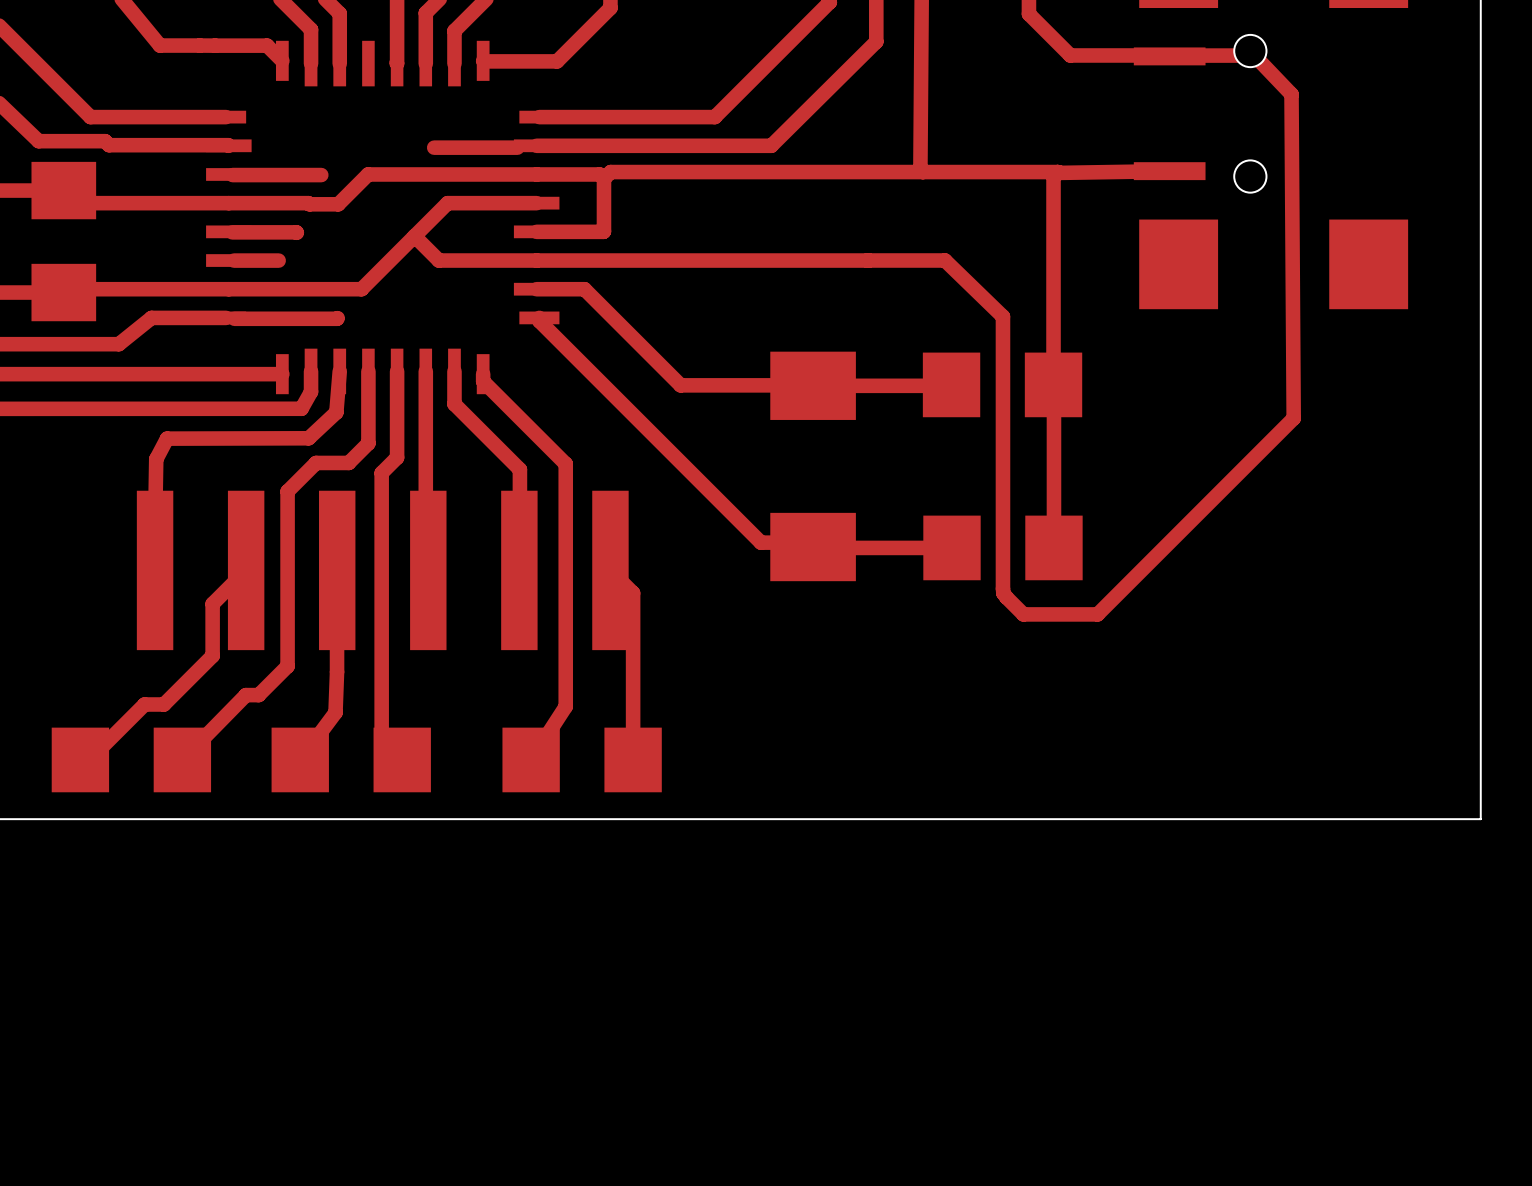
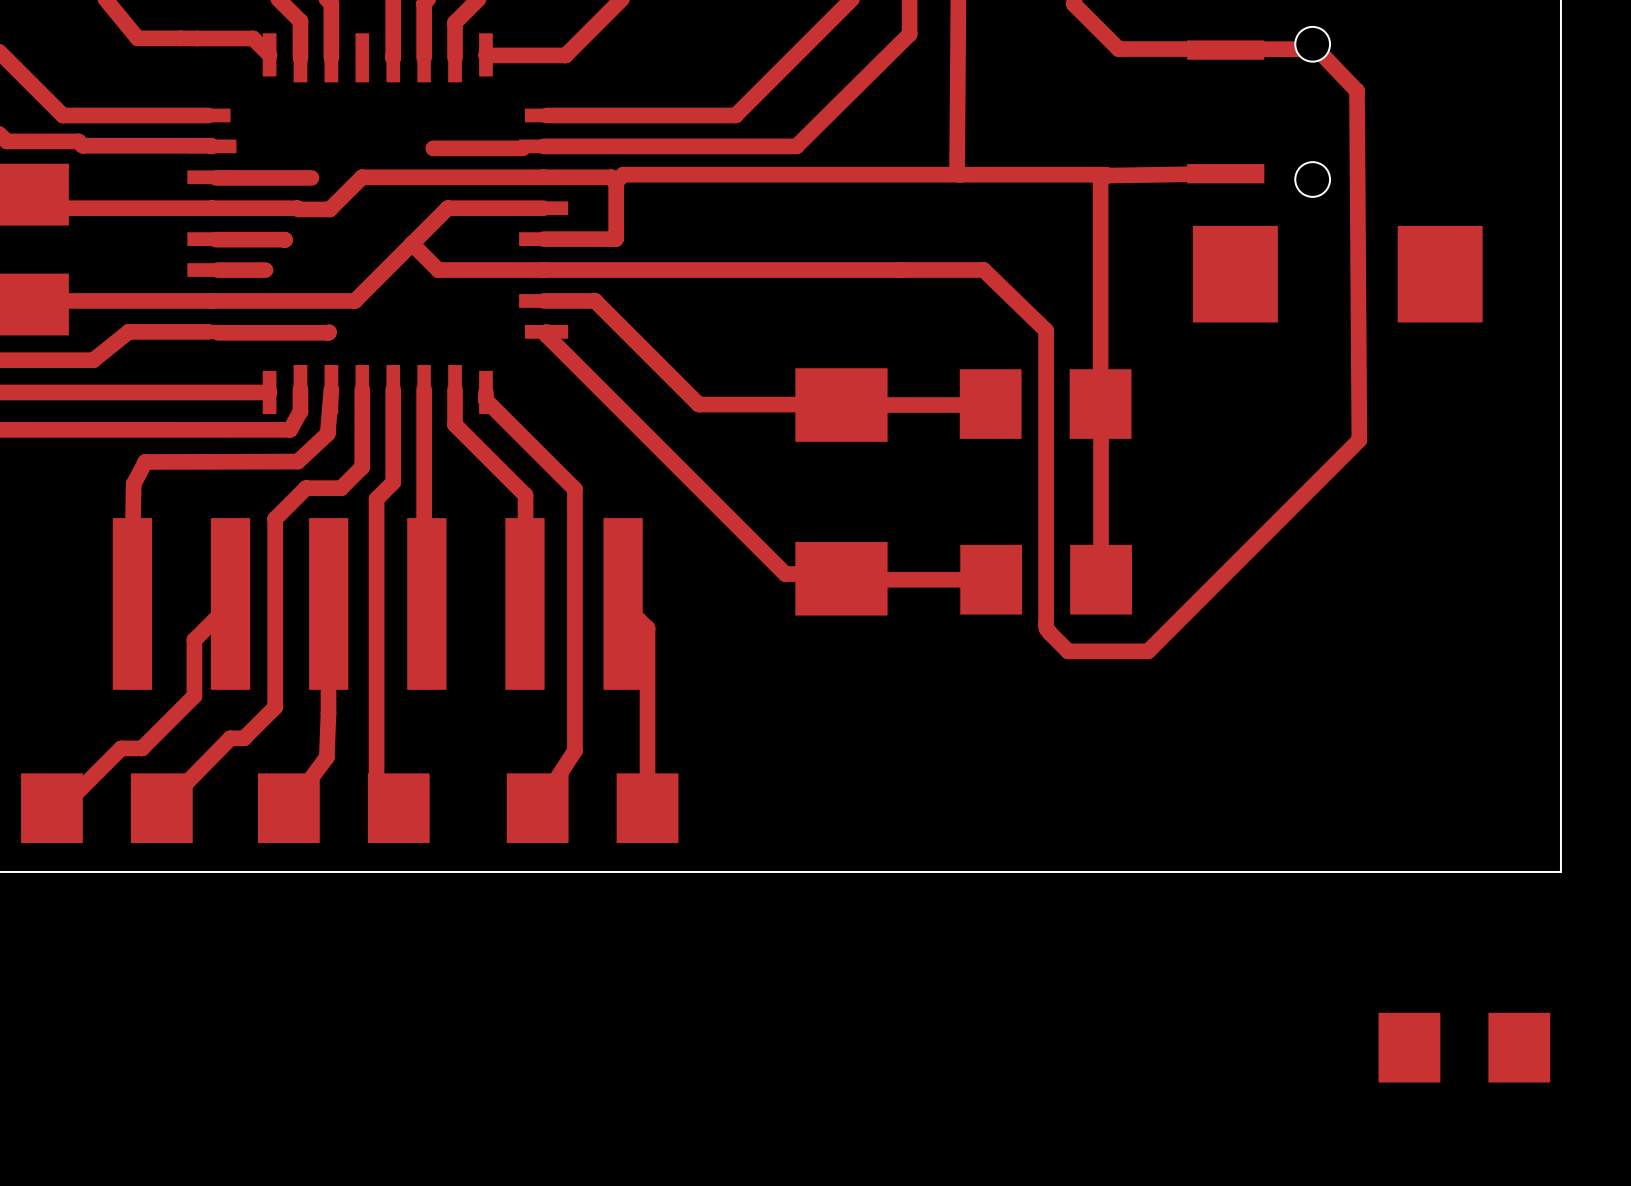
part: none -> (1464, 1047)

